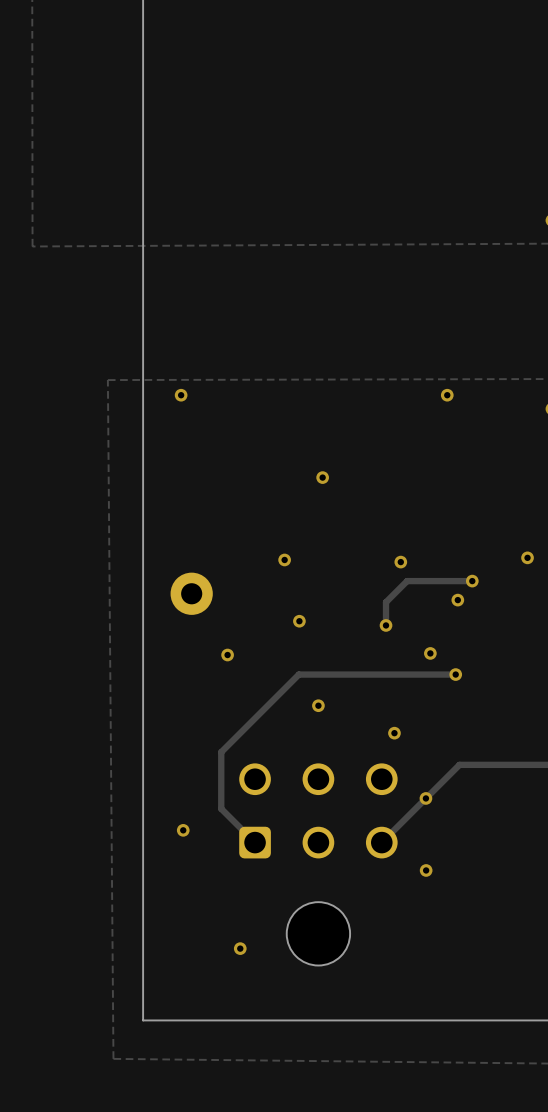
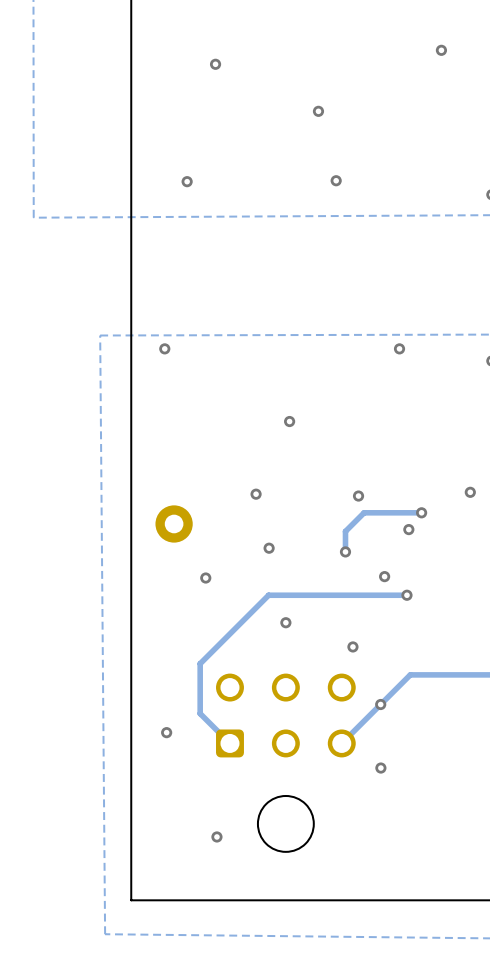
via: none -> (441, 50)
via: none -> (215, 64)
via: none -> (318, 111)
via: none -> (336, 180)
via: none -> (187, 181)

